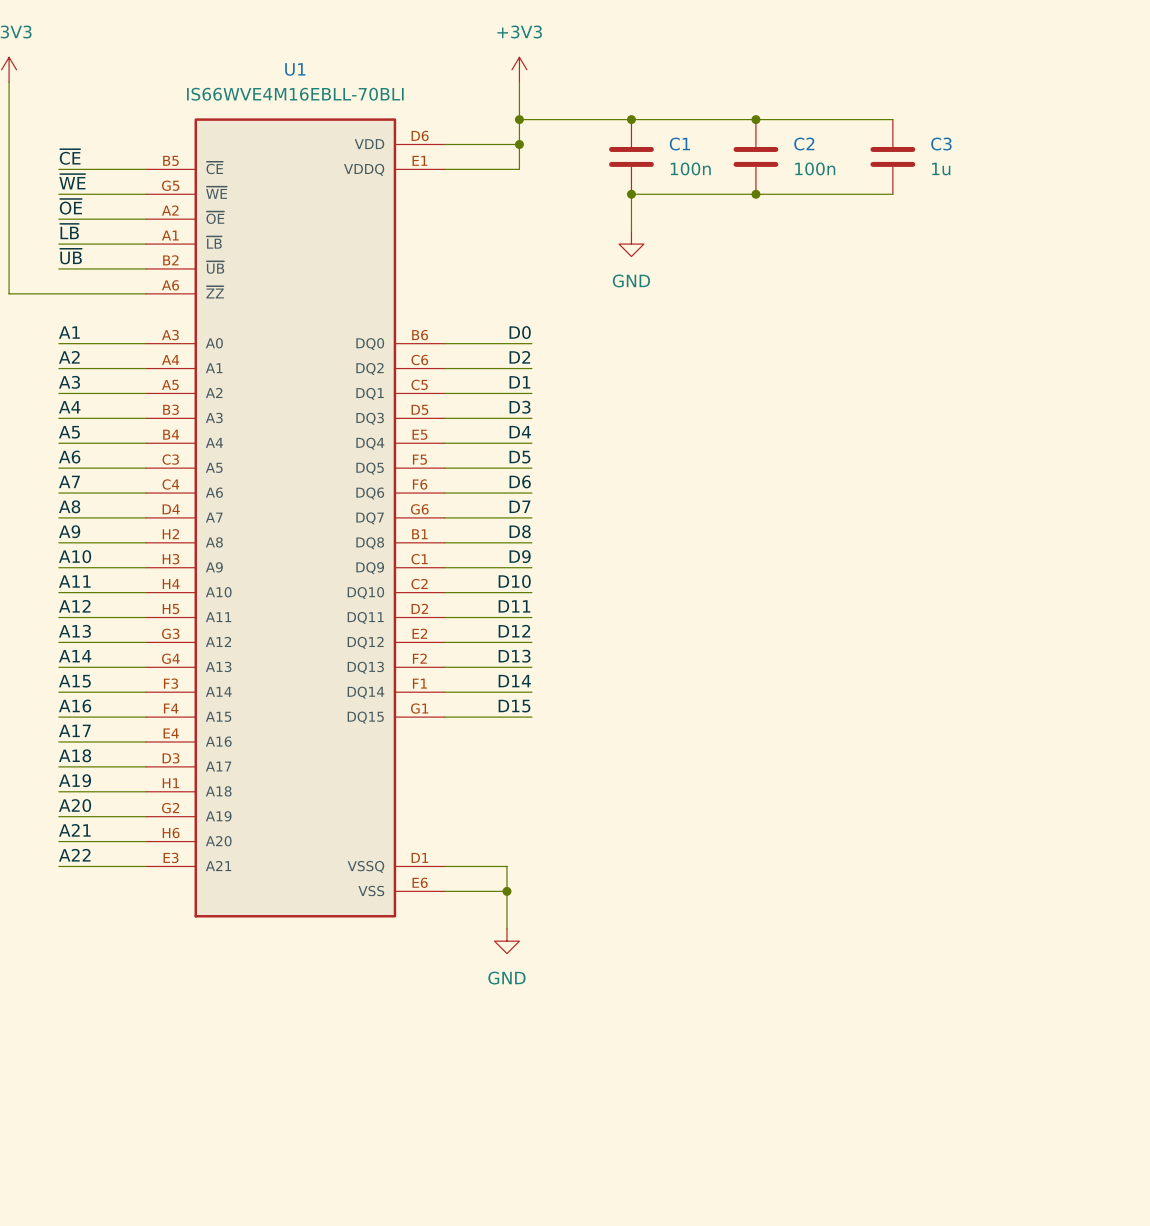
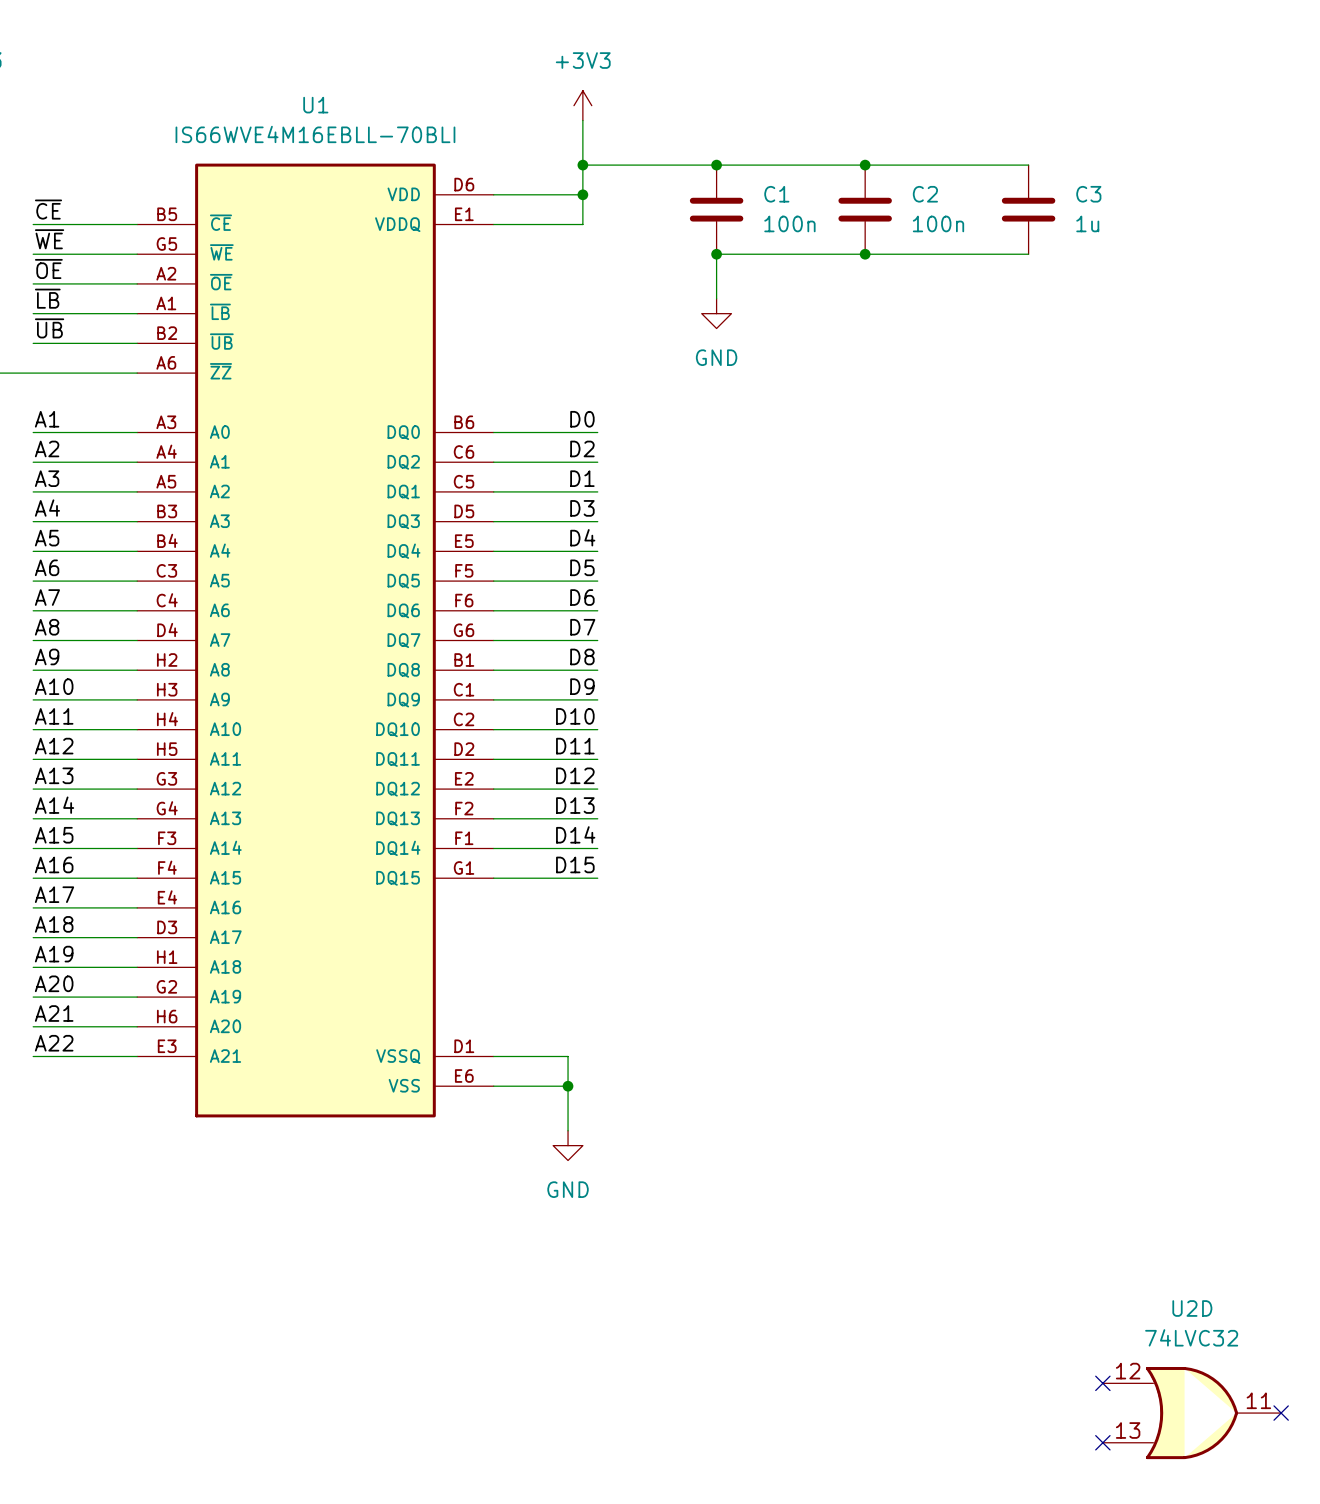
no-connect mark: none -> (1102, 1383)
U2D: none -> 74LVC32 (1192, 1413)
no-connect mark: none -> (1281, 1413)
no-connect mark: none -> (1102, 1442)

